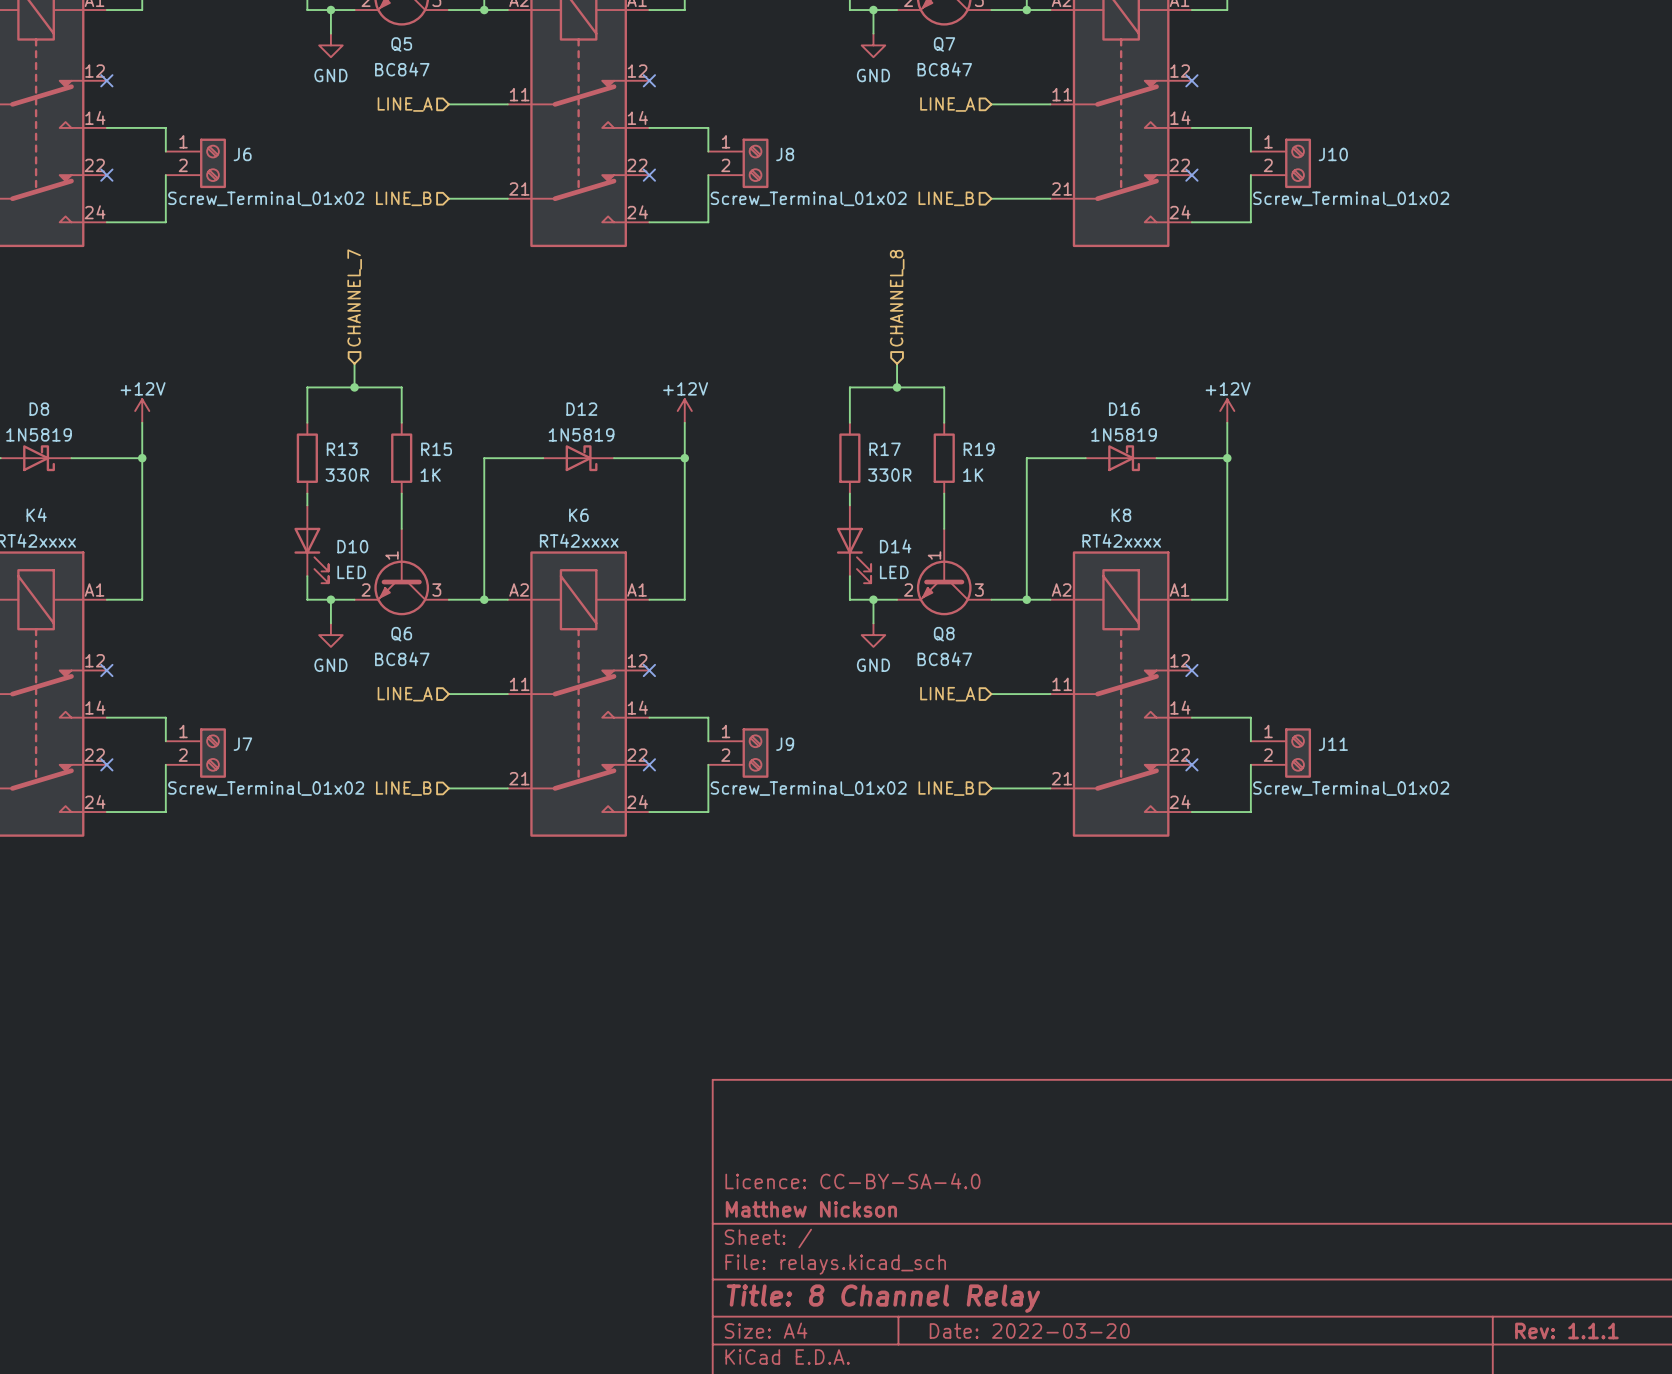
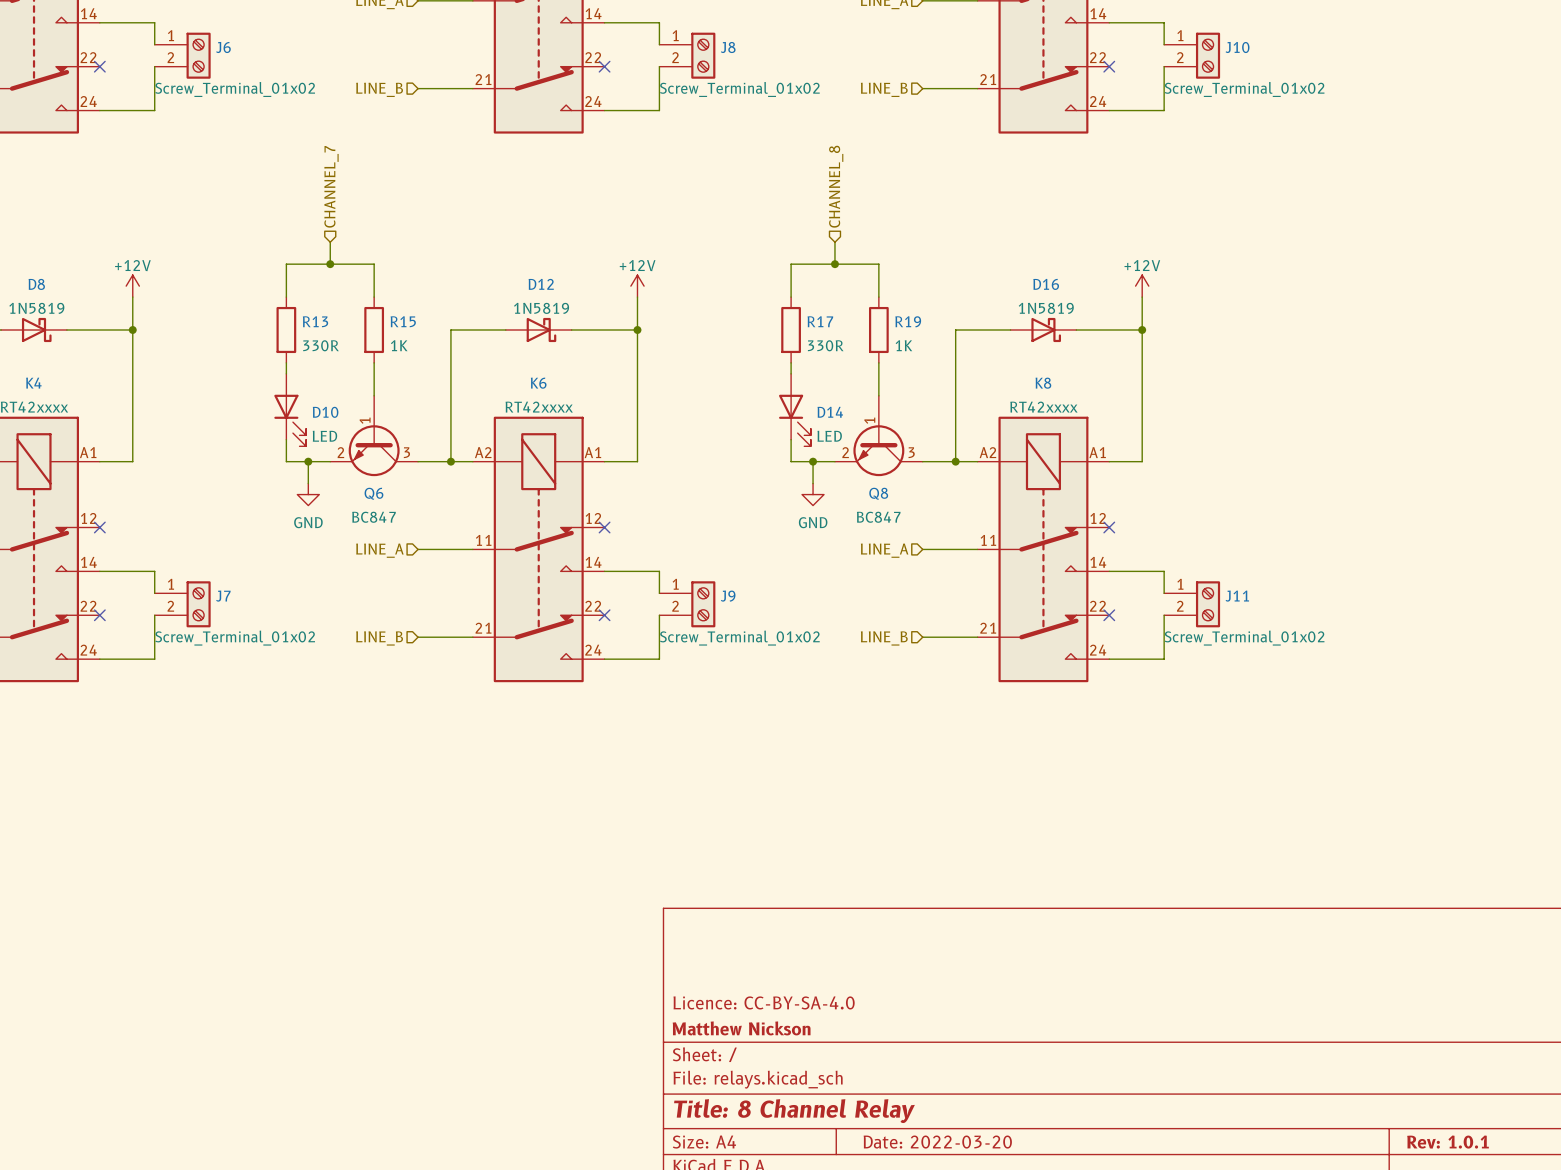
title block: Rev: 1.1.1 (1566, 1330) -> Rev: 1.0.1 (1448, 1142)

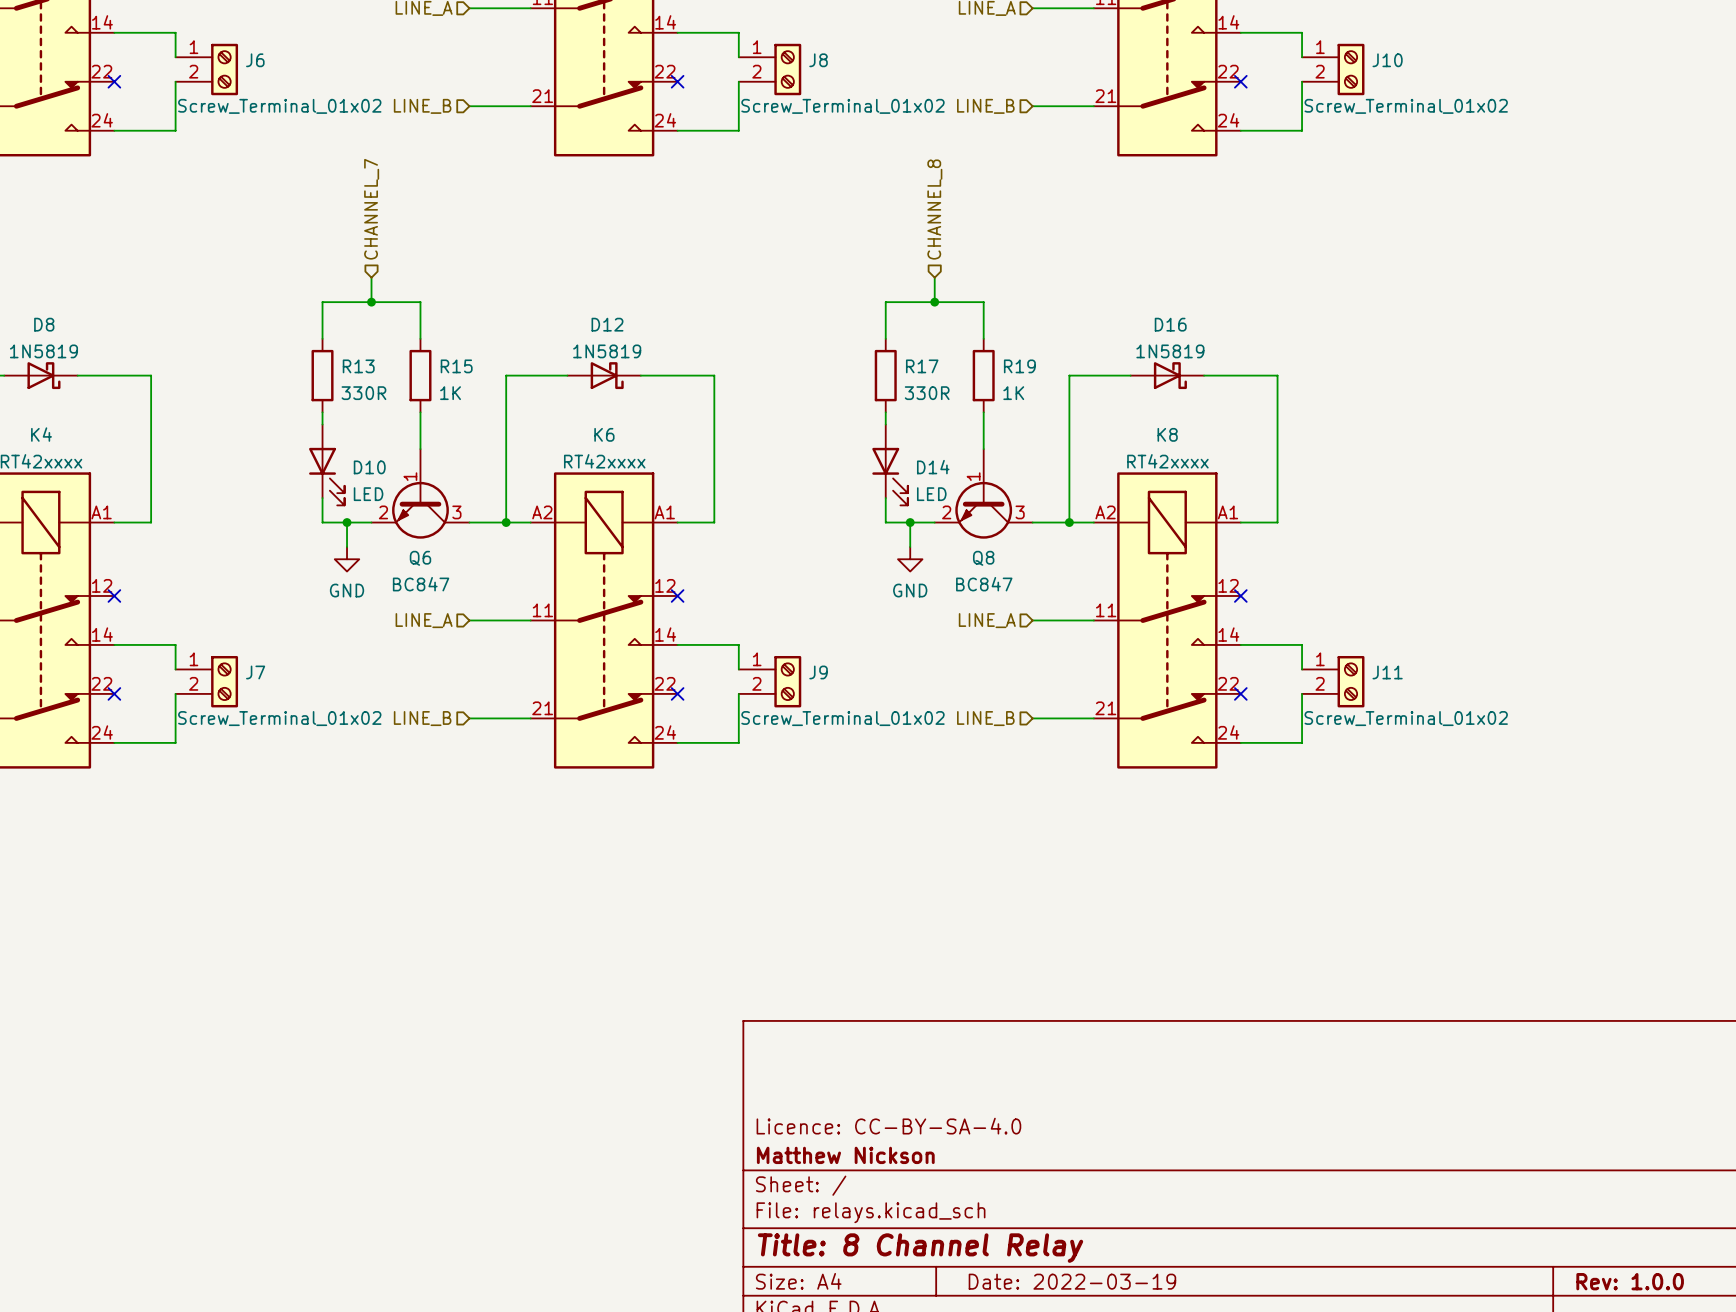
power symbol: +12V (132, 286) -> none
power symbol: +12V (637, 286) -> none
power symbol: +12V (1142, 286) -> none
wire: (132, 297) (132, 330) -> none
wire: (637, 297) (637, 330) -> none
wire: (1142, 297) (1142, 330) -> none
junction: (132, 330) -> none
junction: (637, 330) -> none
junction: (1142, 330) -> none
title block: Date: 2022-03-20 (937, 1142) -> Date: 2022-03-19 (1072, 1281)
title block: Rev: 1.0.1 (1448, 1142) -> Rev: 1.0.0 (1630, 1281)

